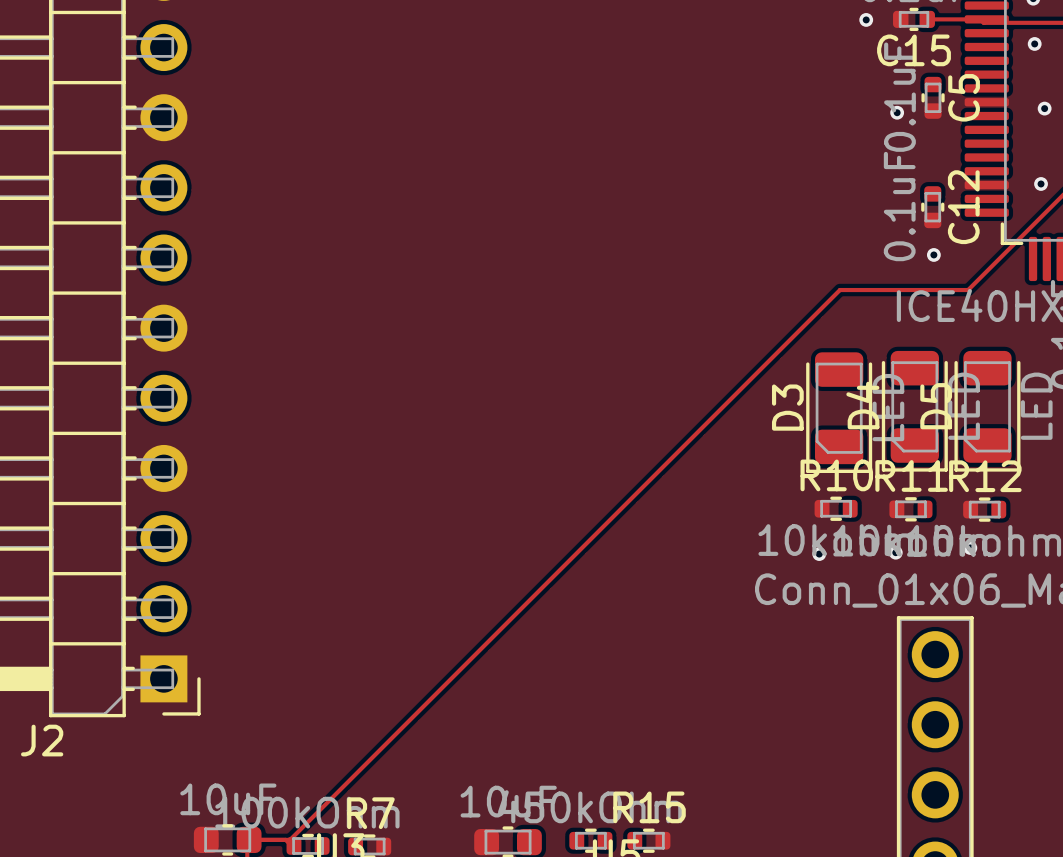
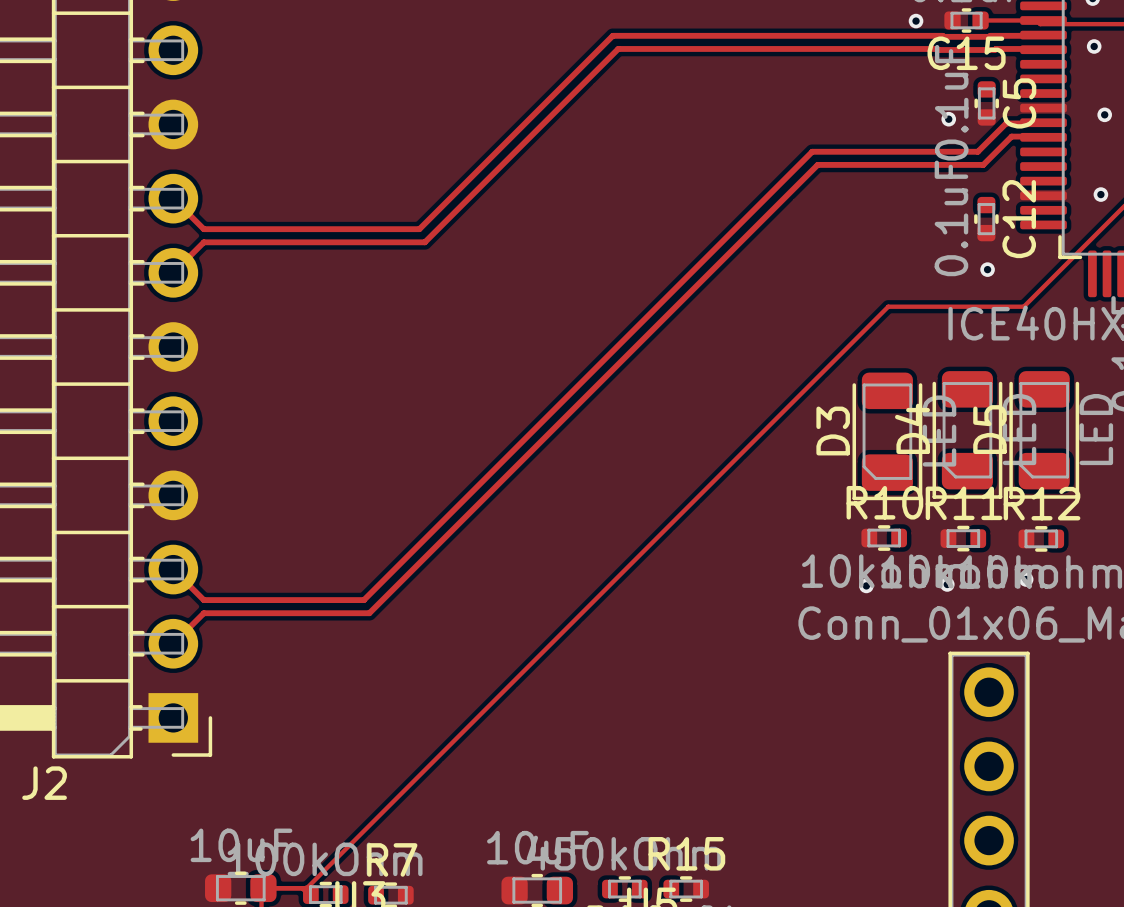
track: none -> (1043, 35) (989, 36) (612, 35) (419, 229) (203, 229) (173, 198)
track: none -> (1043, 49) (618, 48) (424, 242) (203, 242) (173, 272)
track: none -> (1043, 122) (1006, 123) (977, 151) (812, 151) (363, 600) (203, 600) (173, 569)
track: none -> (1043, 137) (1011, 136) (983, 164) (817, 164) (369, 613) (203, 613) (173, 643)

